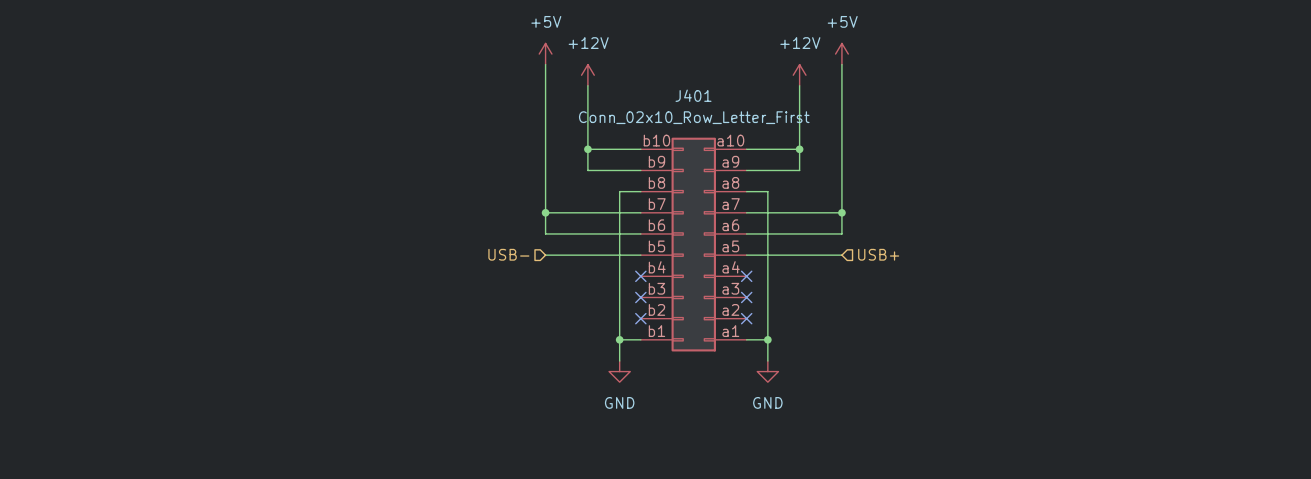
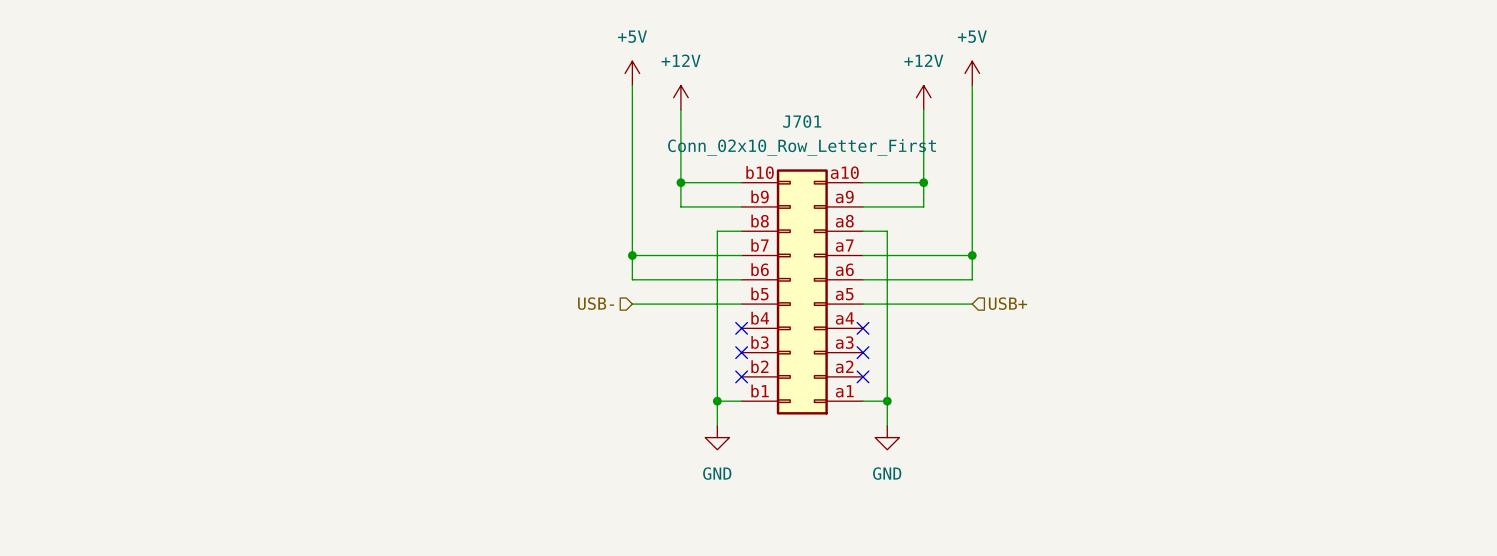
J401 name: J401 (693, 95) -> J701 (802, 121)

